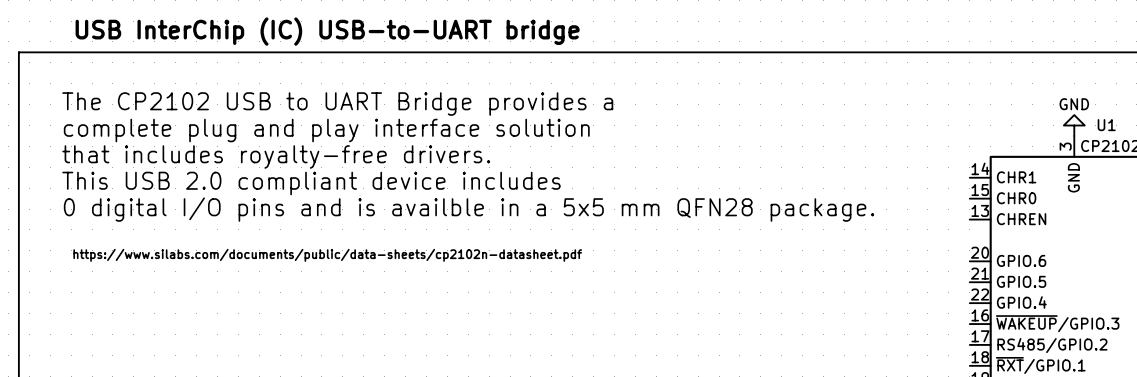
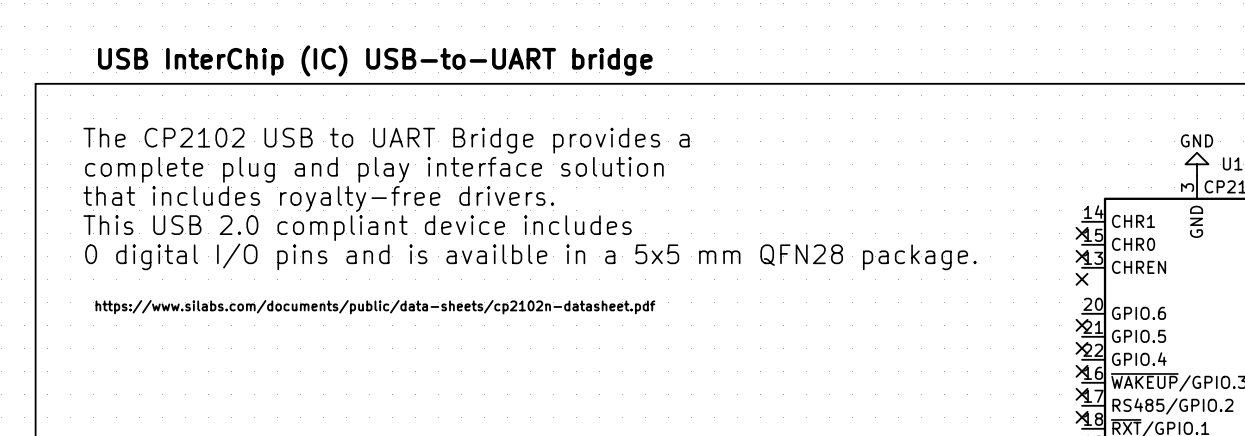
no-connect mark: none -> (1082, 233)
no-connect mark: none -> (1082, 256)
no-connect mark: none -> (1082, 279)
no-connect mark: none -> (1082, 325)
no-connect mark: none -> (1082, 348)
no-connect mark: none -> (1082, 371)
no-connect mark: none -> (1082, 394)
no-connect mark: none -> (1082, 417)

